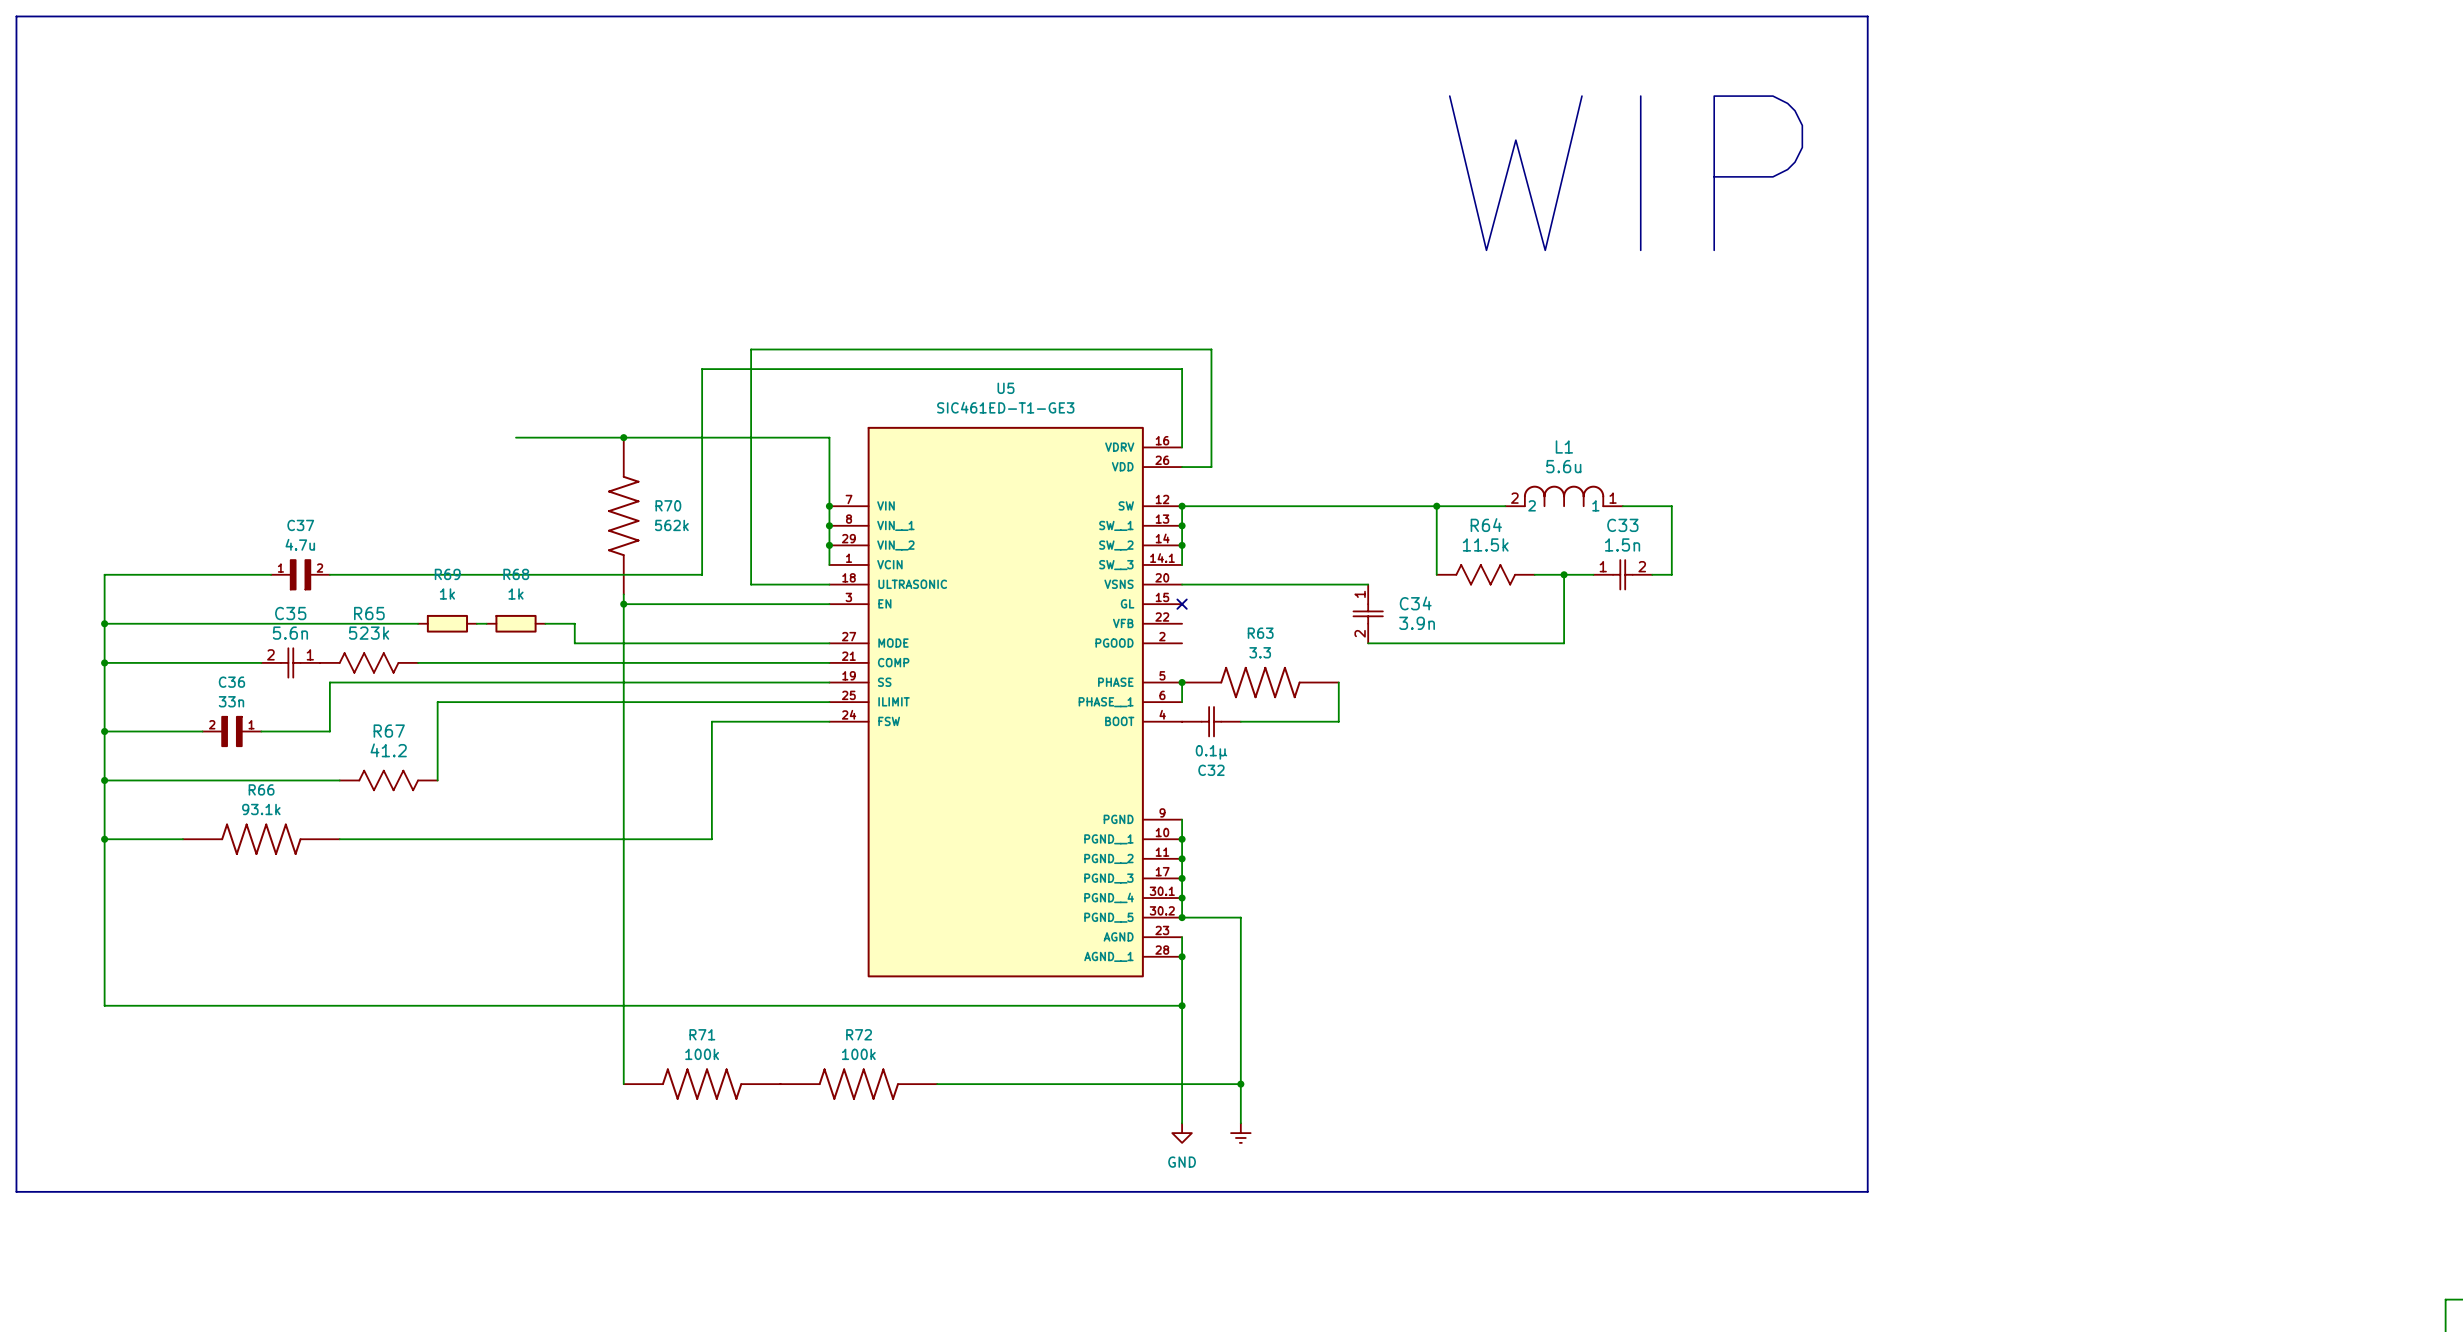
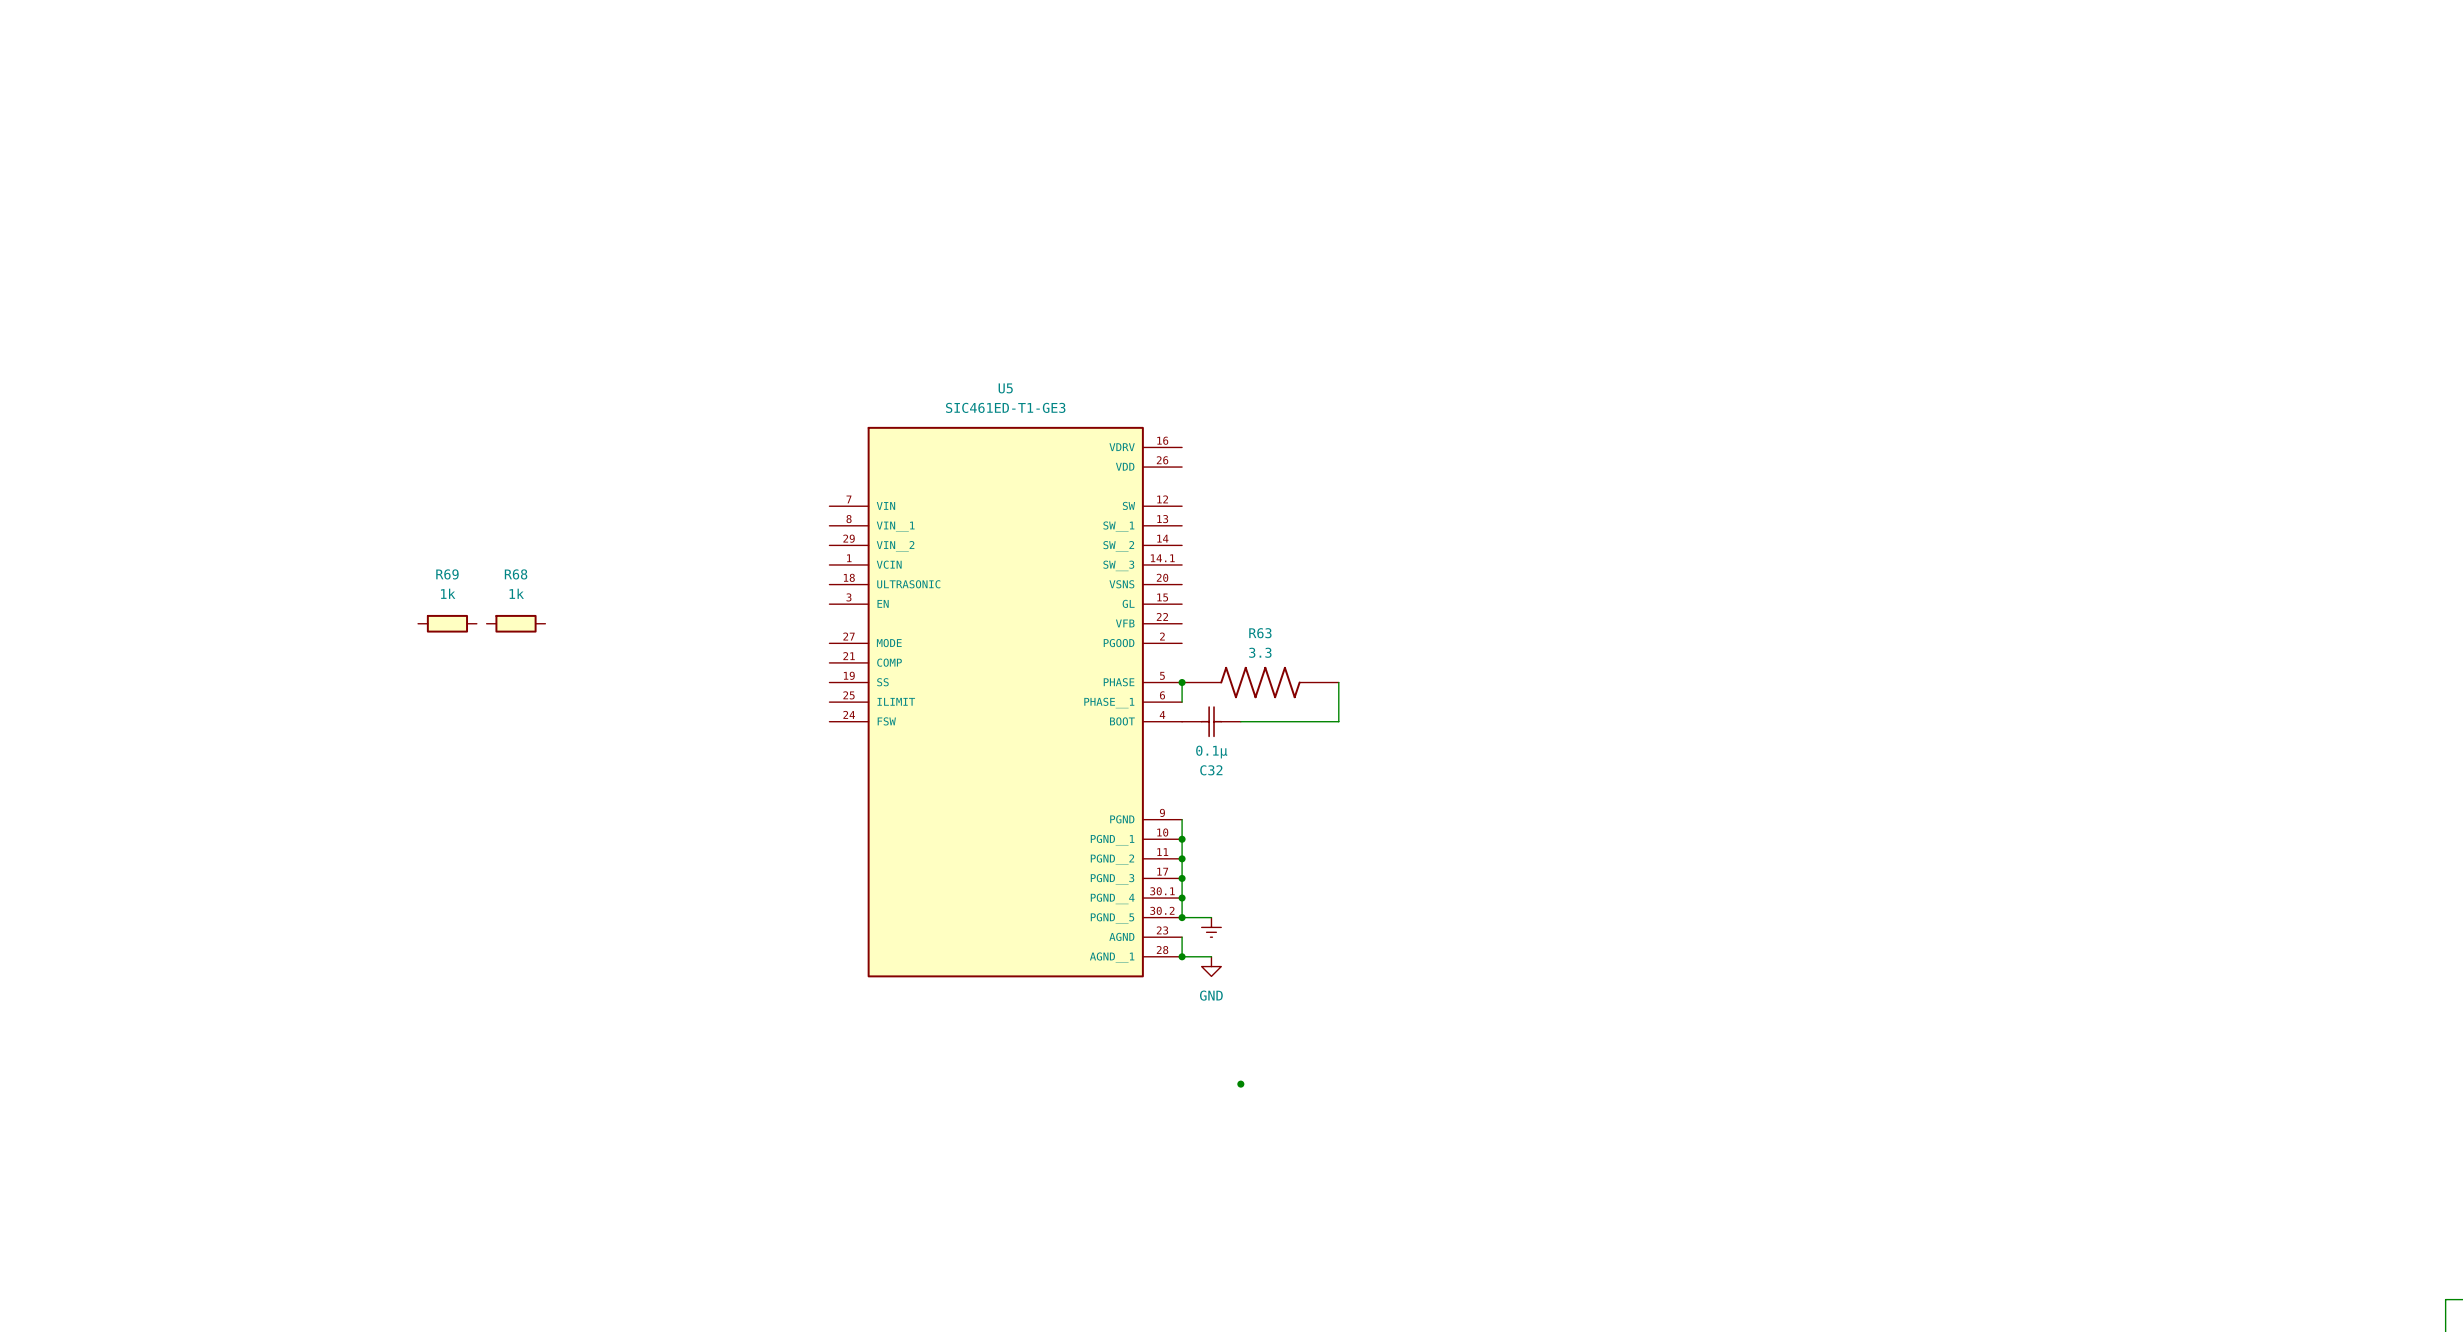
line: (16, 16) (1867, 16) (1867, 1191) (16, 1191) (16, 16) -> none
text: WIP (1626, 173) -> none
wire: (516, 437) (829, 437) (829, 564) -> none
junction: (623, 437) -> none
wire: (1182, 447) (1182, 369) (702, 369) (702, 574) (329, 574) -> none
wire: (1182, 467) (1211, 467) (1211, 349) (751, 349) (751, 584) (829, 584) -> none
L1: 5.6u (1564, 496) -> none
junction: (829, 506) -> none
junction: (1182, 506) -> none
wire: (1436, 506) (1436, 574) -> none
junction: (1436, 506) -> none
wire: (1505, 506) (1182, 506) (1182, 564) -> none
wire: (1622, 506) (1671, 506) (1671, 574) (1652, 574) -> none
R70: 562k (623, 516) -> none
junction: (829, 525) -> none
junction: (1182, 525) -> none
junction: (829, 545) -> none
junction: (1182, 545) -> none
wire: (271, 574) (104, 574) (104, 1005) (1182, 1005) -> none
C37: 4.7u (300, 574) -> none
R64: 11.5k (1485, 574) -> none
wire: (1534, 574) (1593, 574) -> none
wire: (1564, 574) (1564, 643) (1368, 643) -> none
junction: (1564, 574) -> none
C33: 1.5n (1622, 574) -> none
wire: (1182, 584) (1368, 584) -> none
wire: (623, 594) (623, 1084) -> none
wire: (623, 604) (829, 604) -> none
junction: (623, 604) -> none
no-connect mark: (1182, 604) -> none
C34: 3.9n (1368, 613) -> none
wire: (104, 623) (418, 623) -> none
junction: (104, 623) -> none
wire: (476, 623) (486, 623) -> none
wire: (545, 623) (574, 623) (574, 643) (829, 643) -> none
wire: (104, 662) (261, 662) -> none
junction: (104, 662) -> none
C35: 5.6n (290, 662) -> none
R65: 523k (369, 662) -> none
wire: (418, 662) (829, 662) -> none
wire: (829, 682) (329, 682) (329, 731) (261, 731) -> none
wire: (829, 702) (437, 702) (437, 780) -> none
wire: (829, 721) (711, 721) (711, 839) (339, 839) -> none
wire: (104, 731) (202, 731) -> none
junction: (104, 731) -> none
C36: 33n (231, 731) -> none
wire: (104, 780) (339, 780) -> none
junction: (104, 780) -> none
R67: 41.2 (388, 780) -> none
wire: (104, 839) (182, 839) -> none
junction: (104, 839) -> none
R66: 93.1k (261, 839) -> none
wire: (1211, 917) (1240, 917) (1240, 1123) -> none
power symbol: none -> (1211, 927)
wire: (1182, 956) (1182, 1123) -> (1182, 956) (1211, 956)
junction: (1182, 1005) -> none
R71: 100k (702, 1084) -> none
R72: 100k (858, 1084) -> none
wire: (937, 1084) (1240, 1084) -> none
power symbol position: GND (1182, 1133) -> GND (1211, 966)
power symbol: (1240, 1133) -> none

